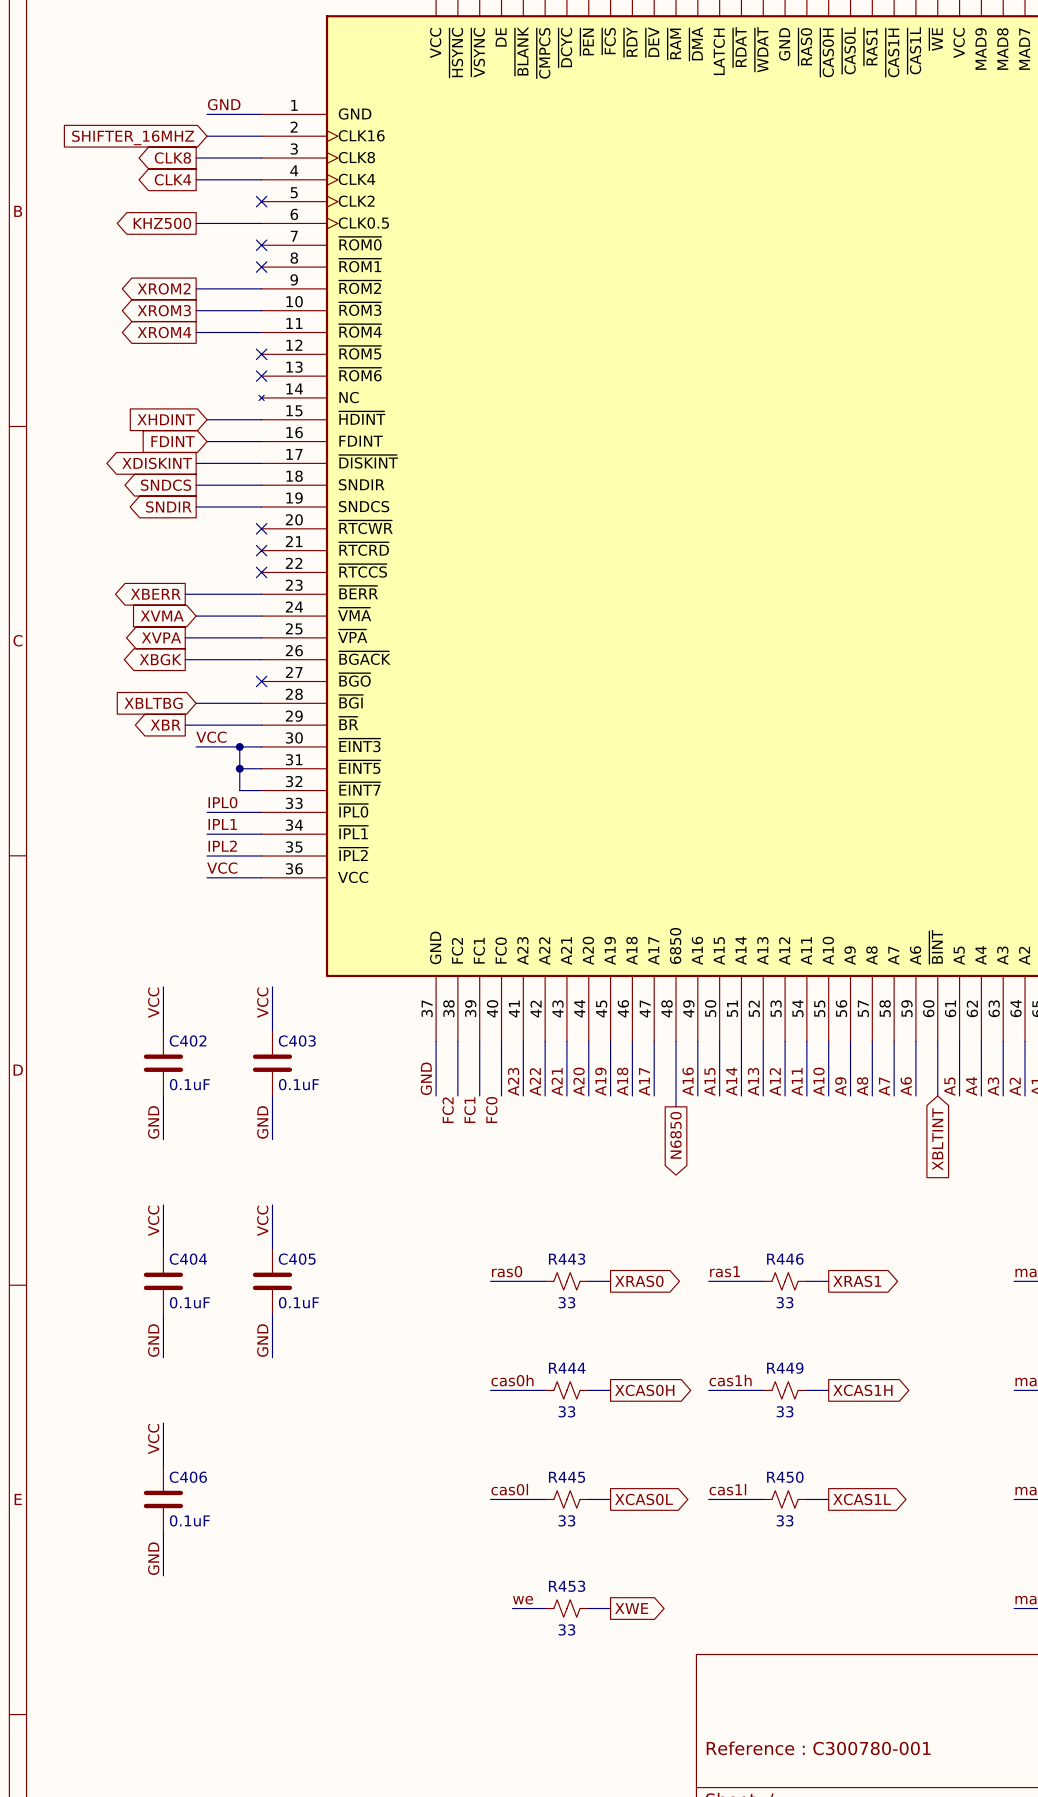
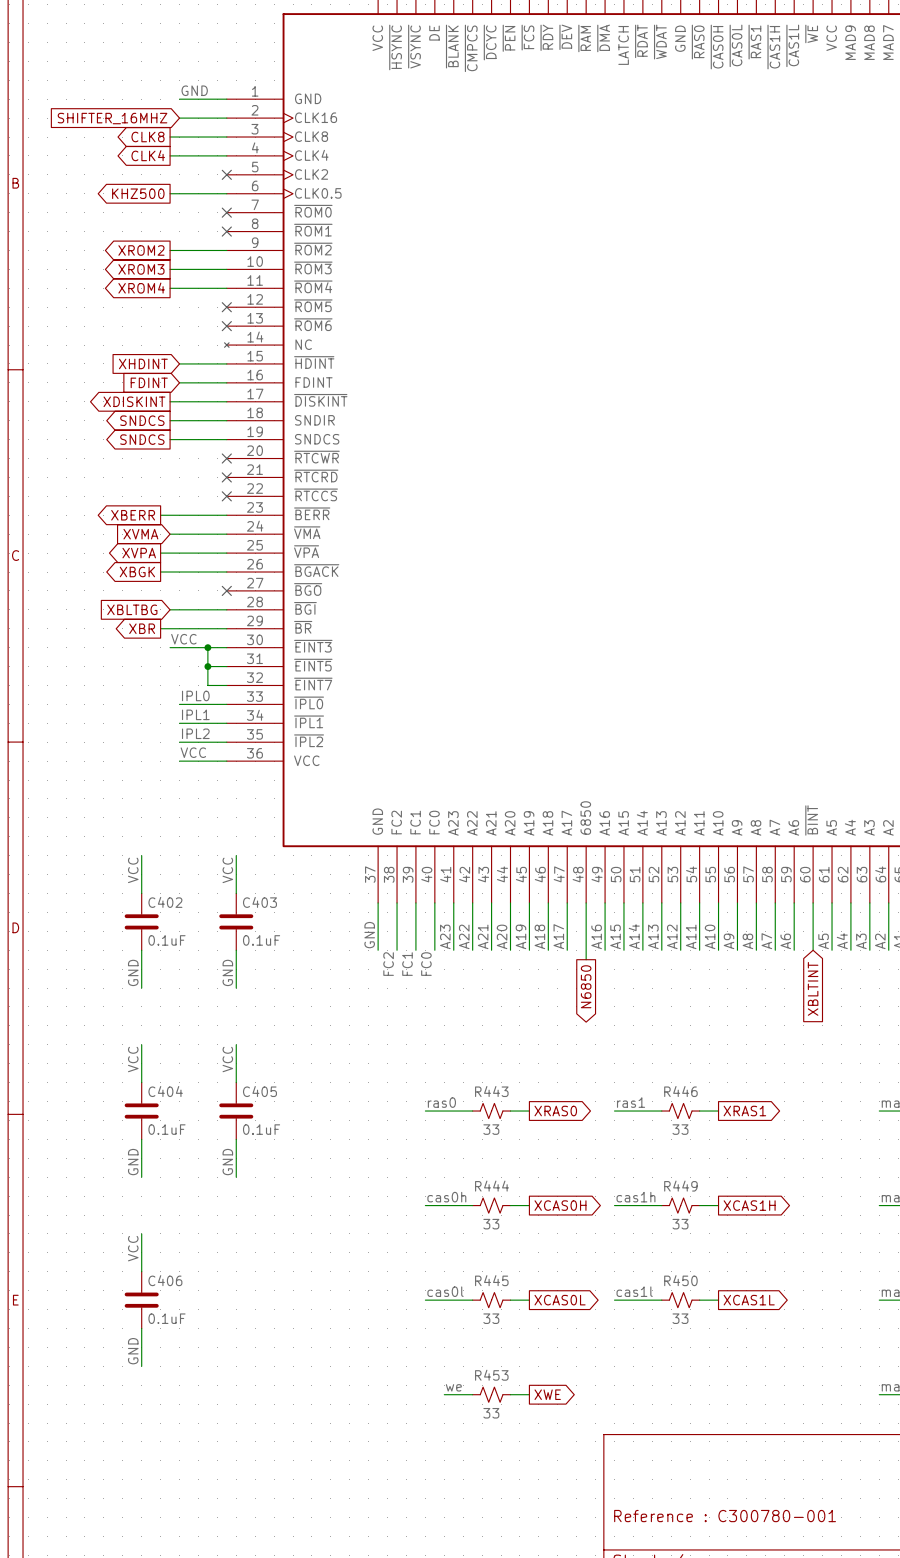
global label: SNDIR (168, 507) -> SNDCS (142, 439)

